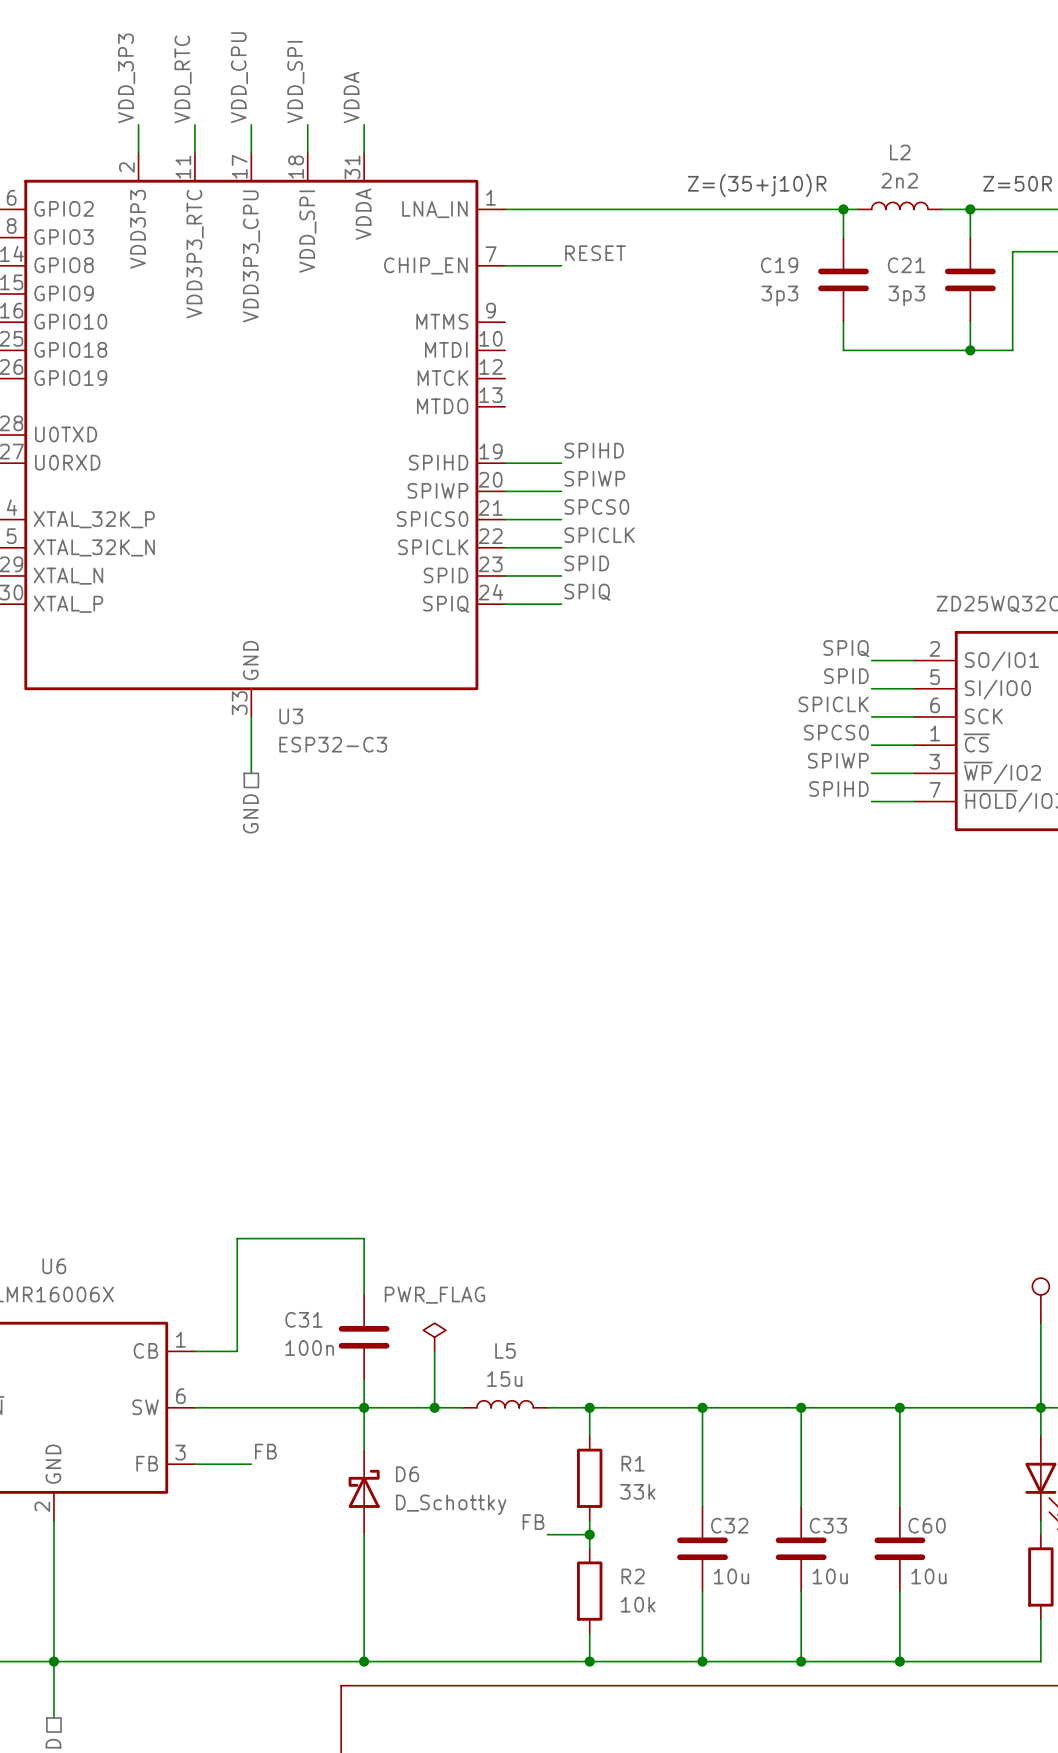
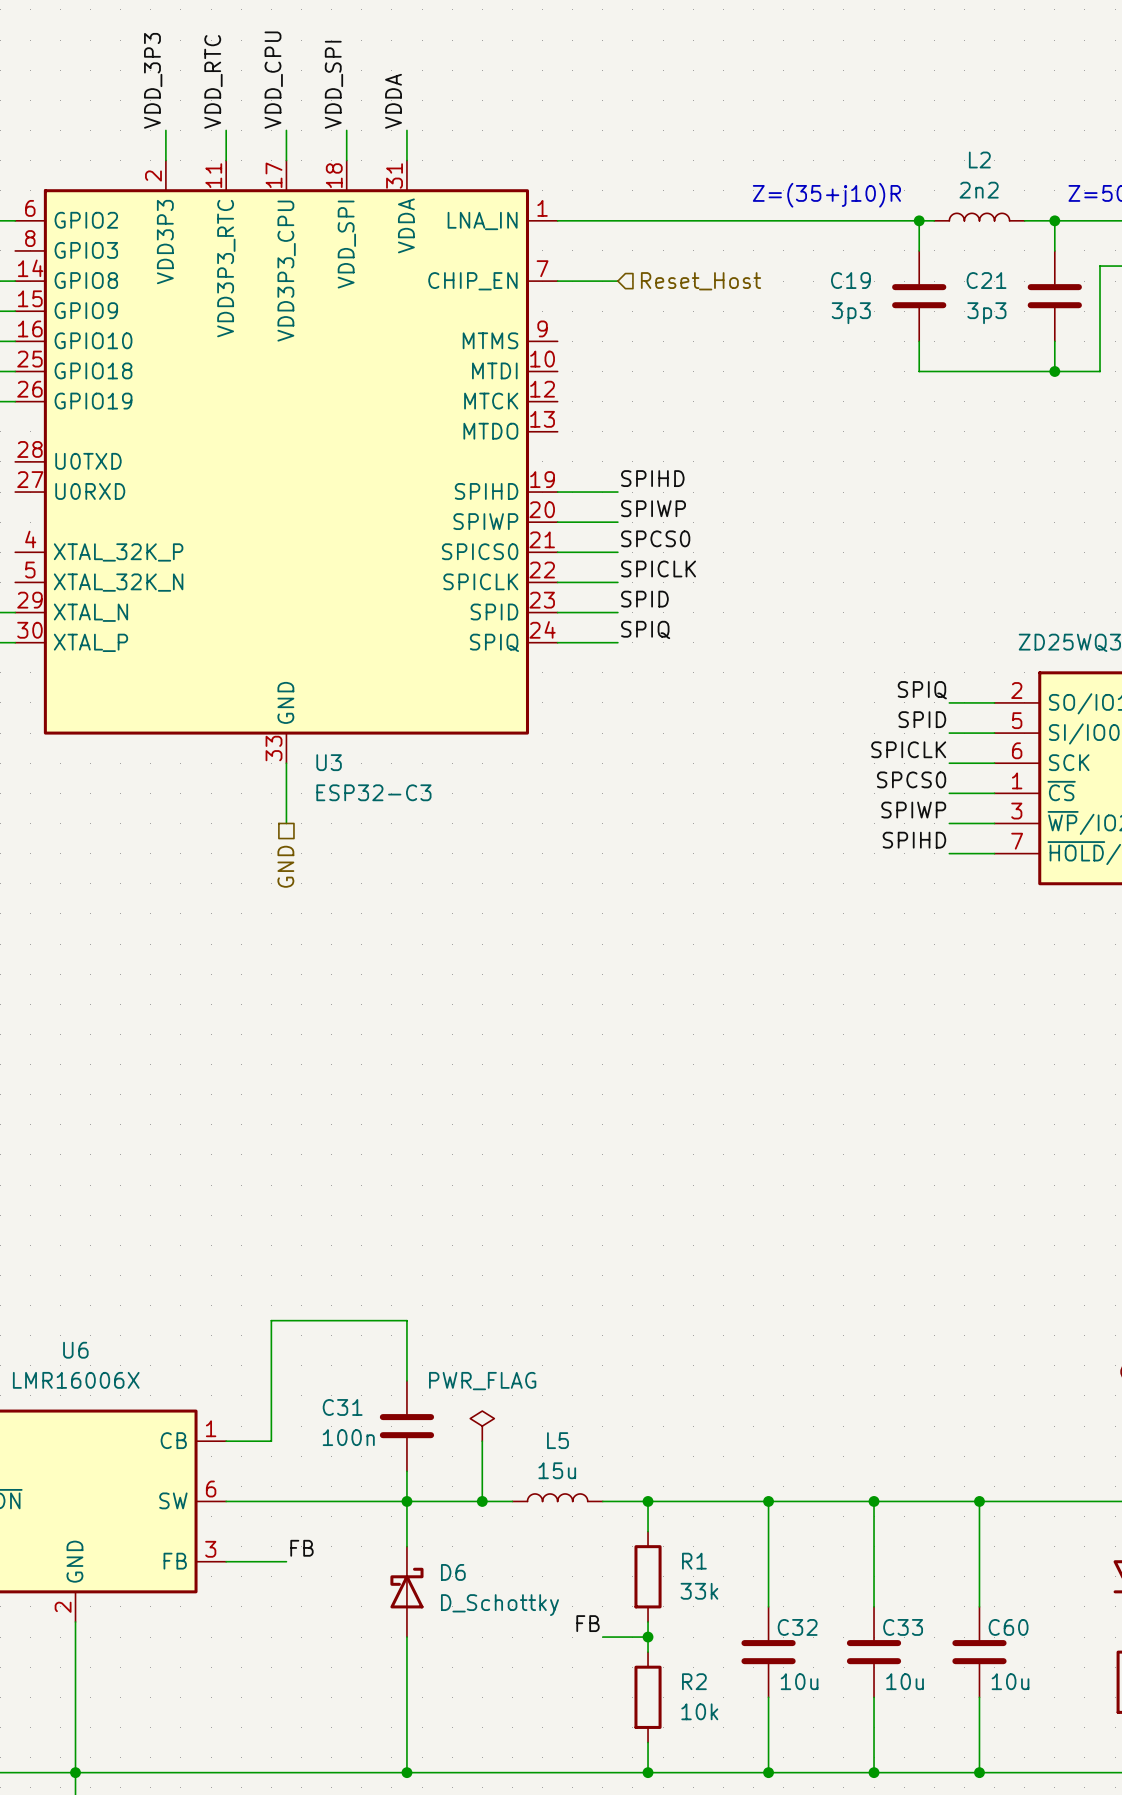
label: RESET (595, 253) -> none
hierarchical label: none -> Reset_Host (700, 281)

